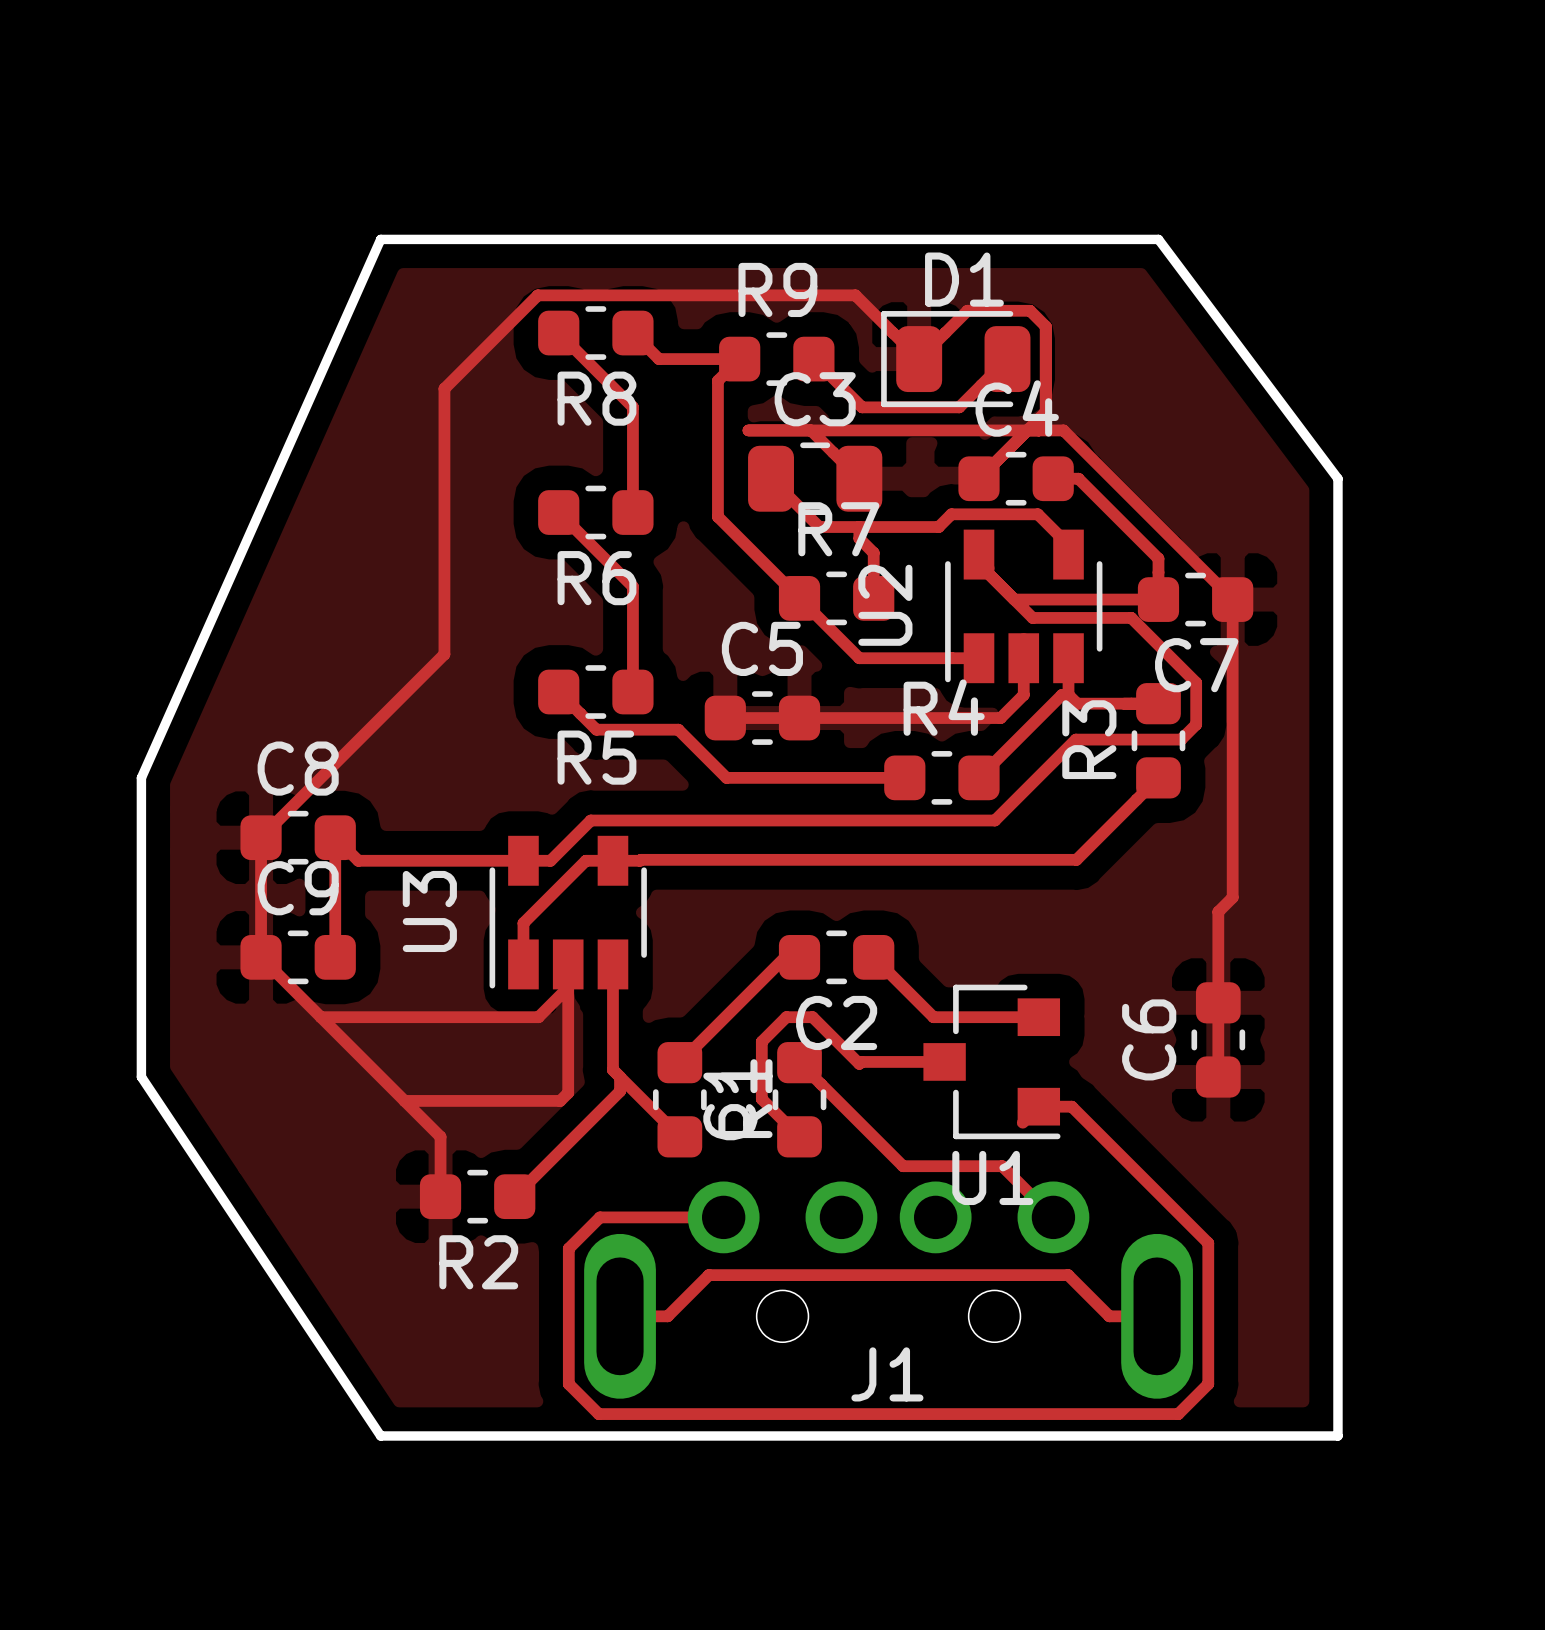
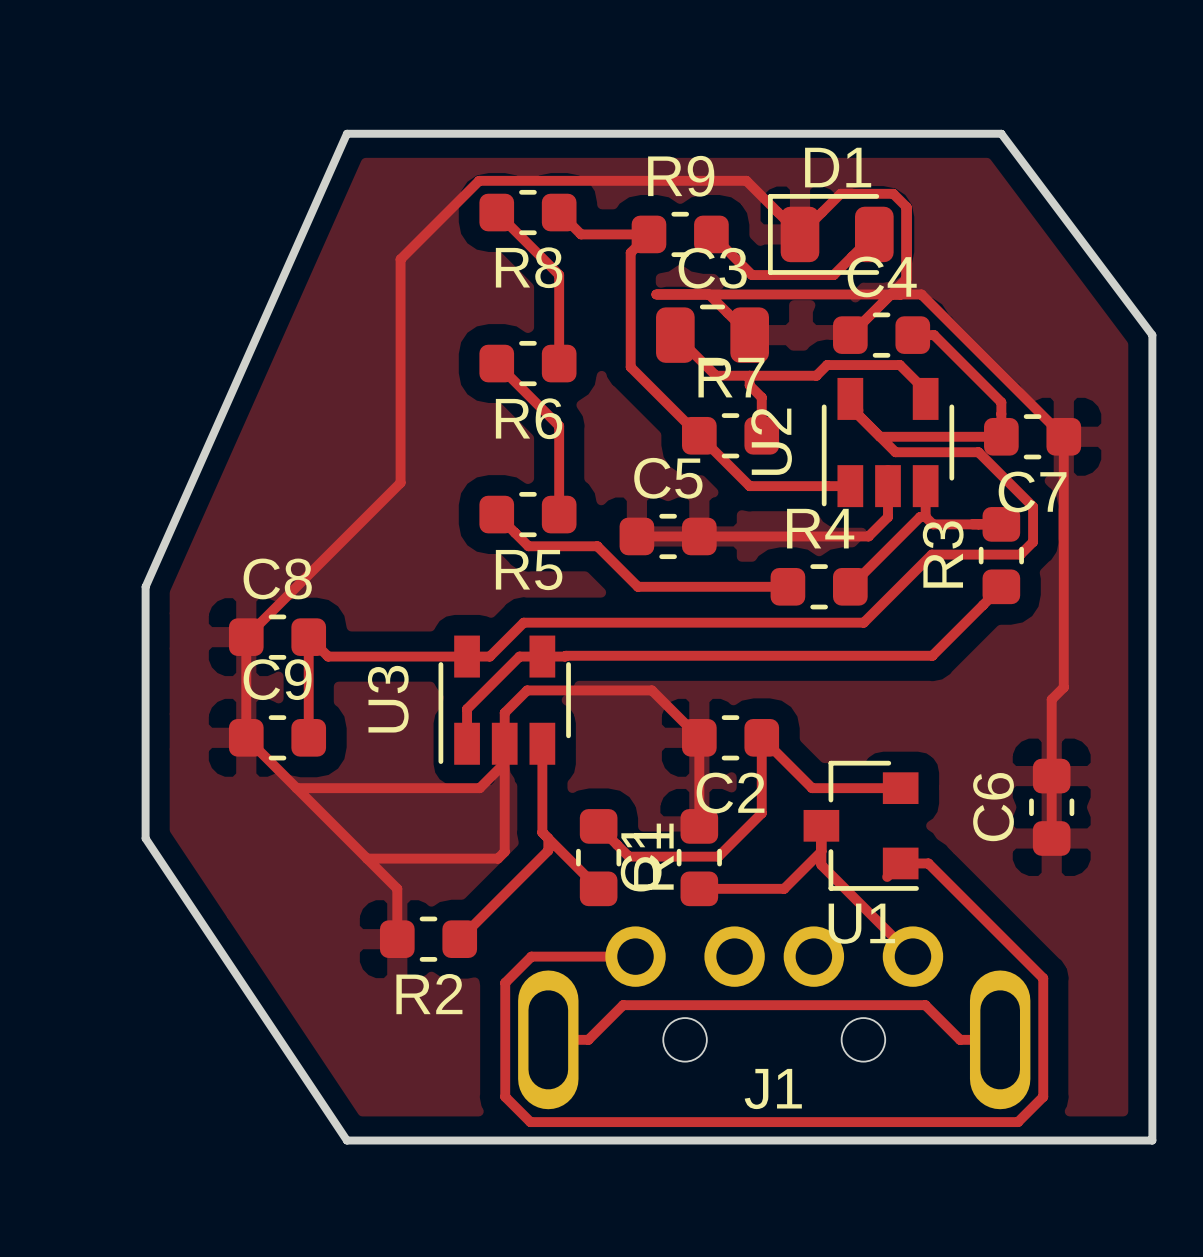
top track: (799, 957) (785, 957) (679, 1062) -> (761, 737) (761, 813) (718, 856) (628, 856) (598, 826)
top track: none -> (504, 743) (504, 712) (527, 690) (651, 690) (699, 737) (699, 826)
top track: (944, 1061) (861, 1061) (859, 1063) (812, 1017) (786, 1017) (761, 1041) (761, 1099) (799, 1136) -> (821, 851) (784, 888) (699, 888)
top track: (799, 1062) (903, 1166) (1002, 1166) -> (821, 825) (821, 865) (869, 913)

